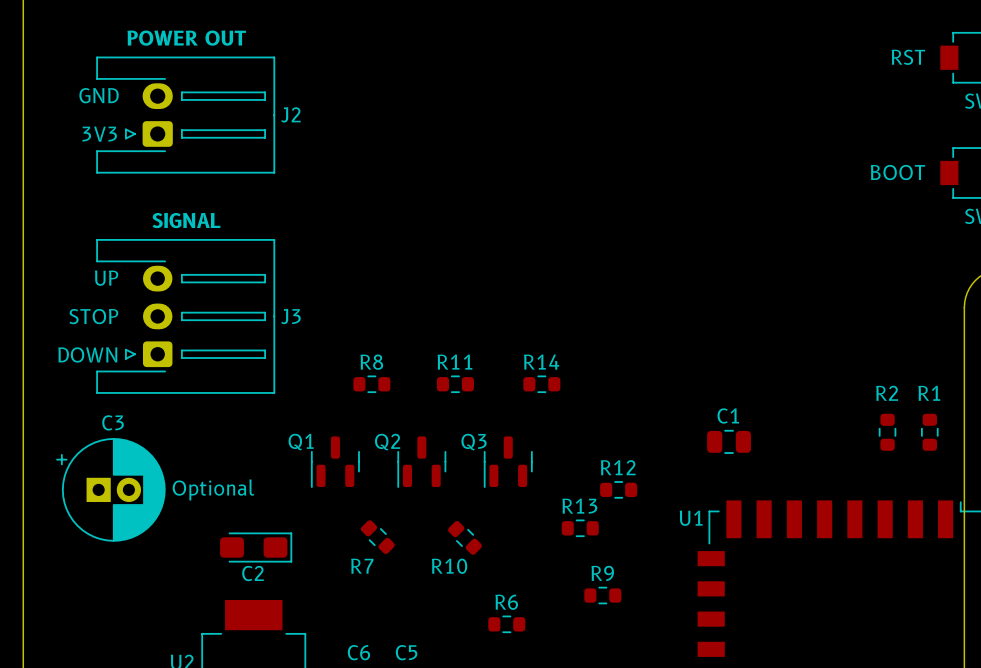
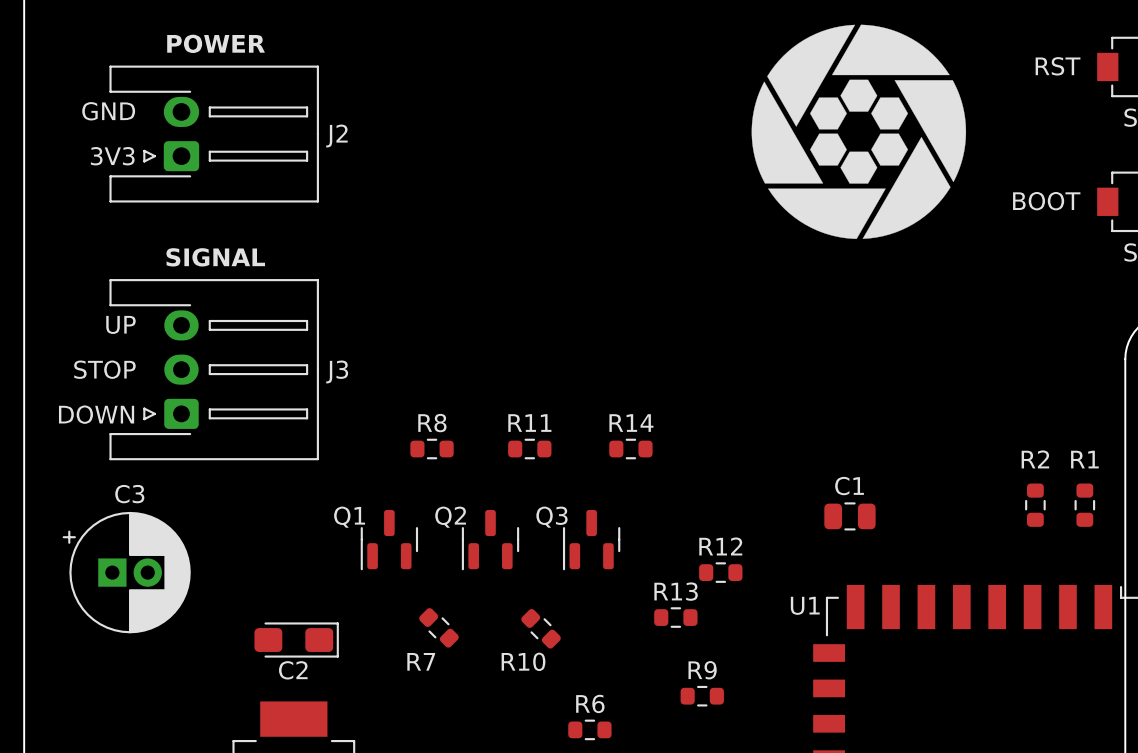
drawing: none -> [751, 24, 967, 239]
J2 value: POWER OUT (186, 38) -> POWER (216, 43)
text: Optional (213, 489) -> none

